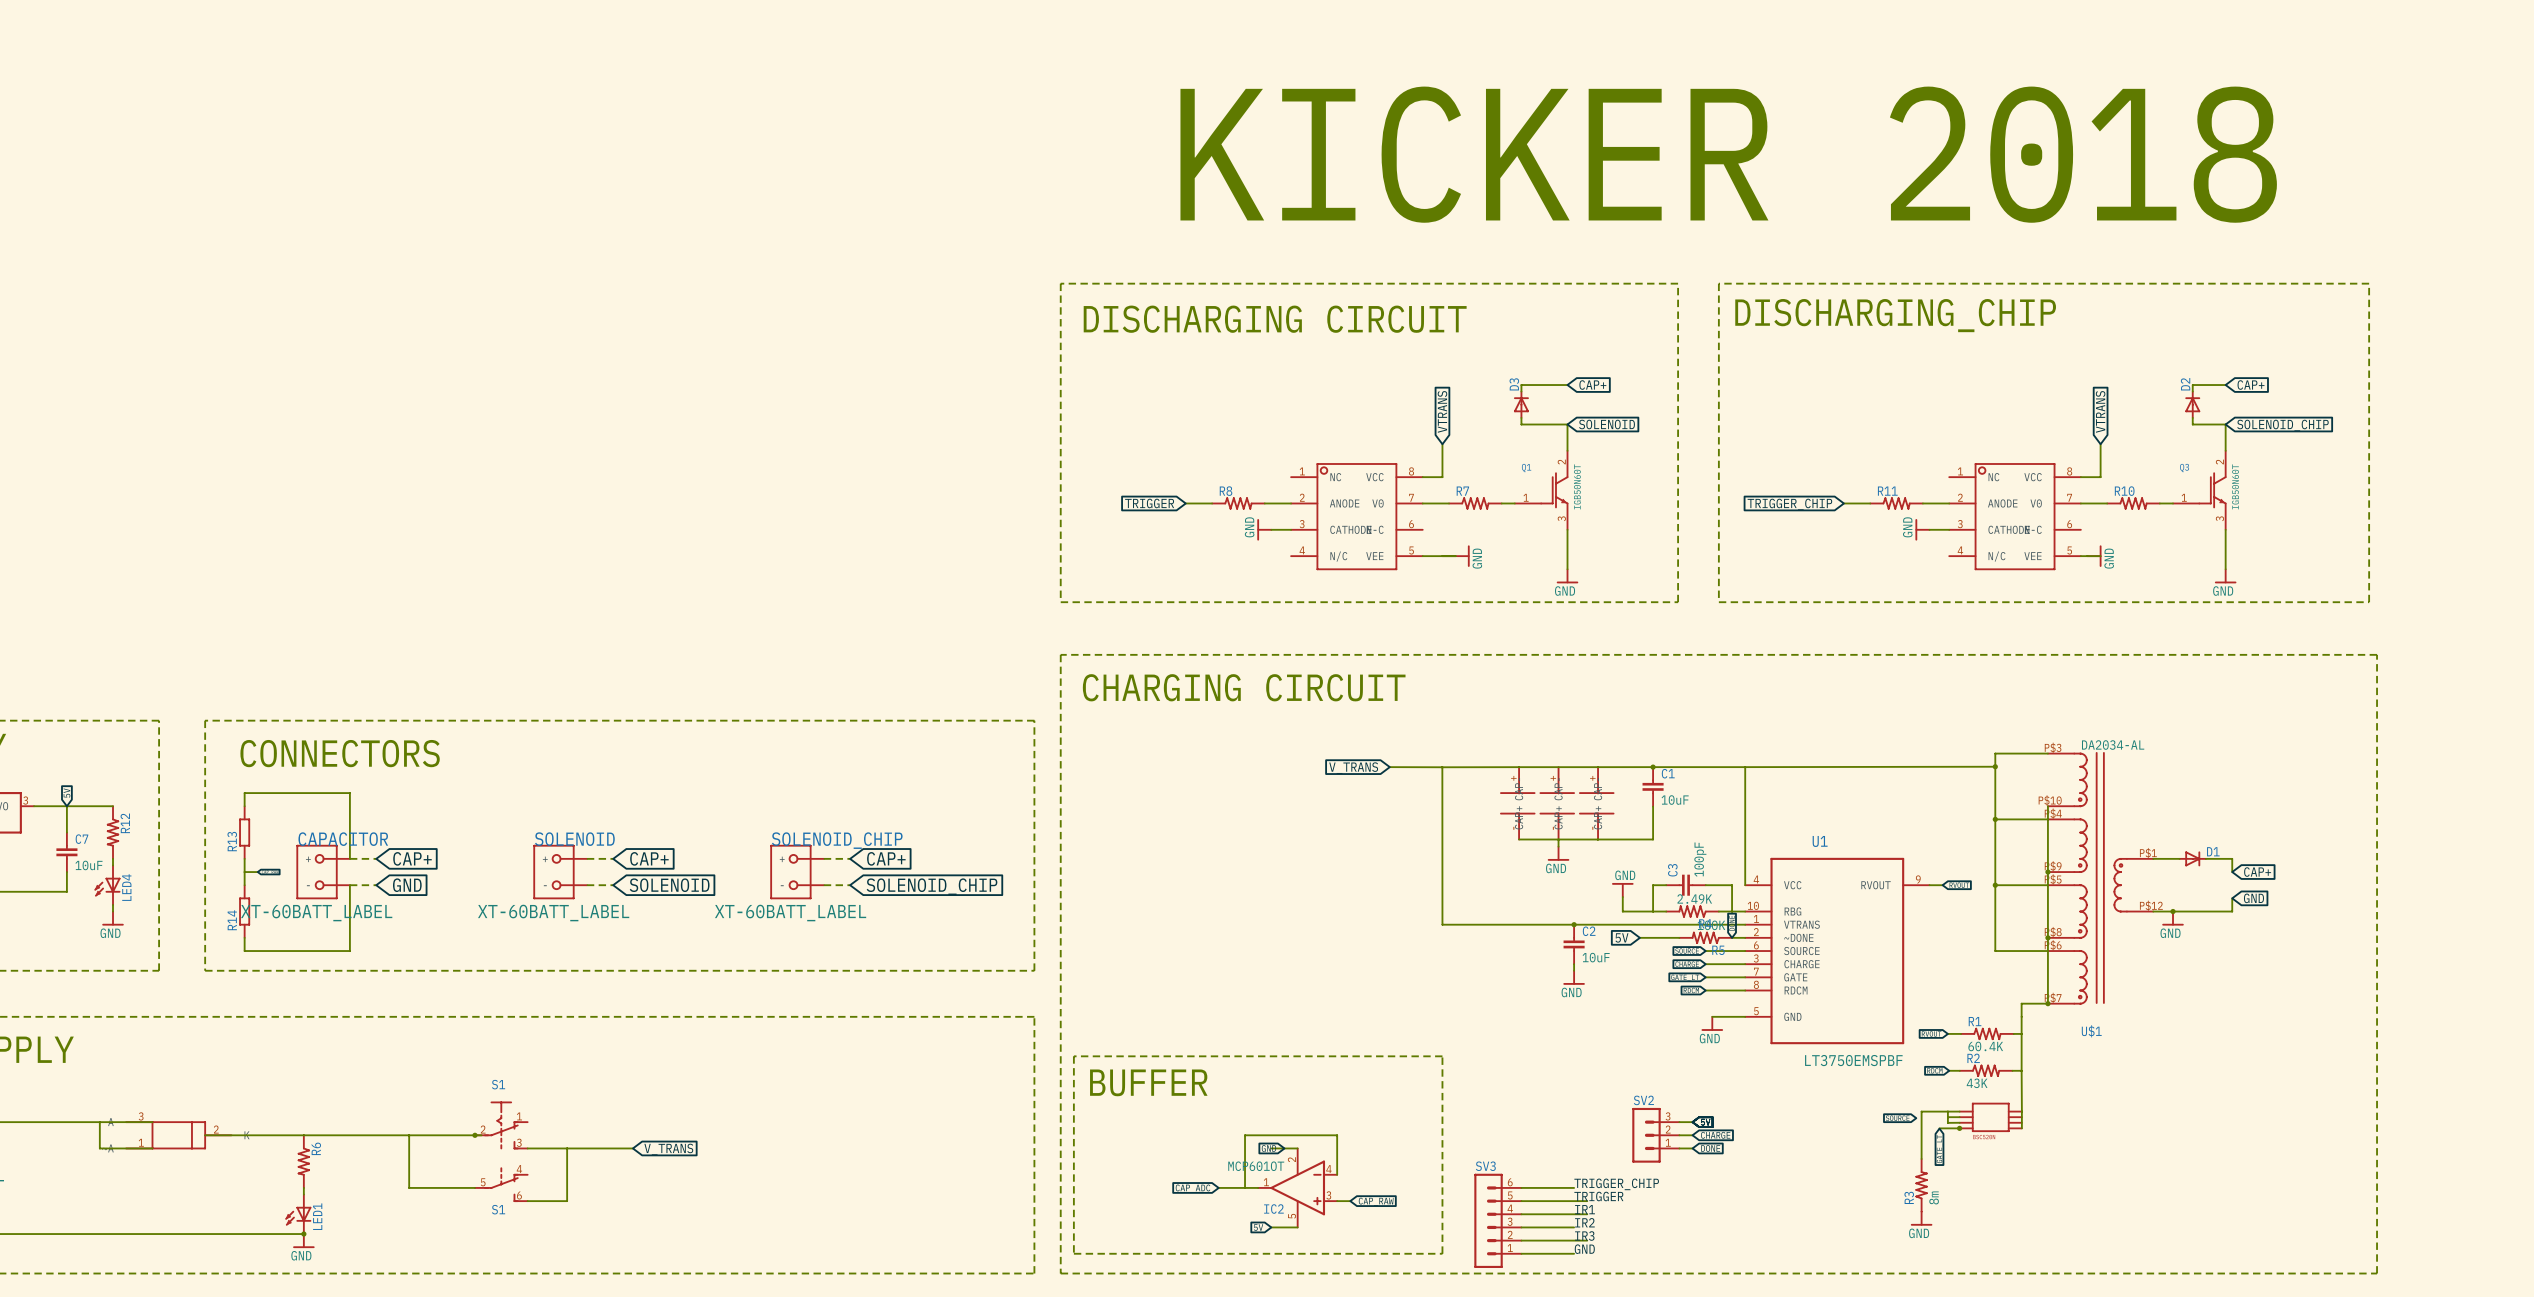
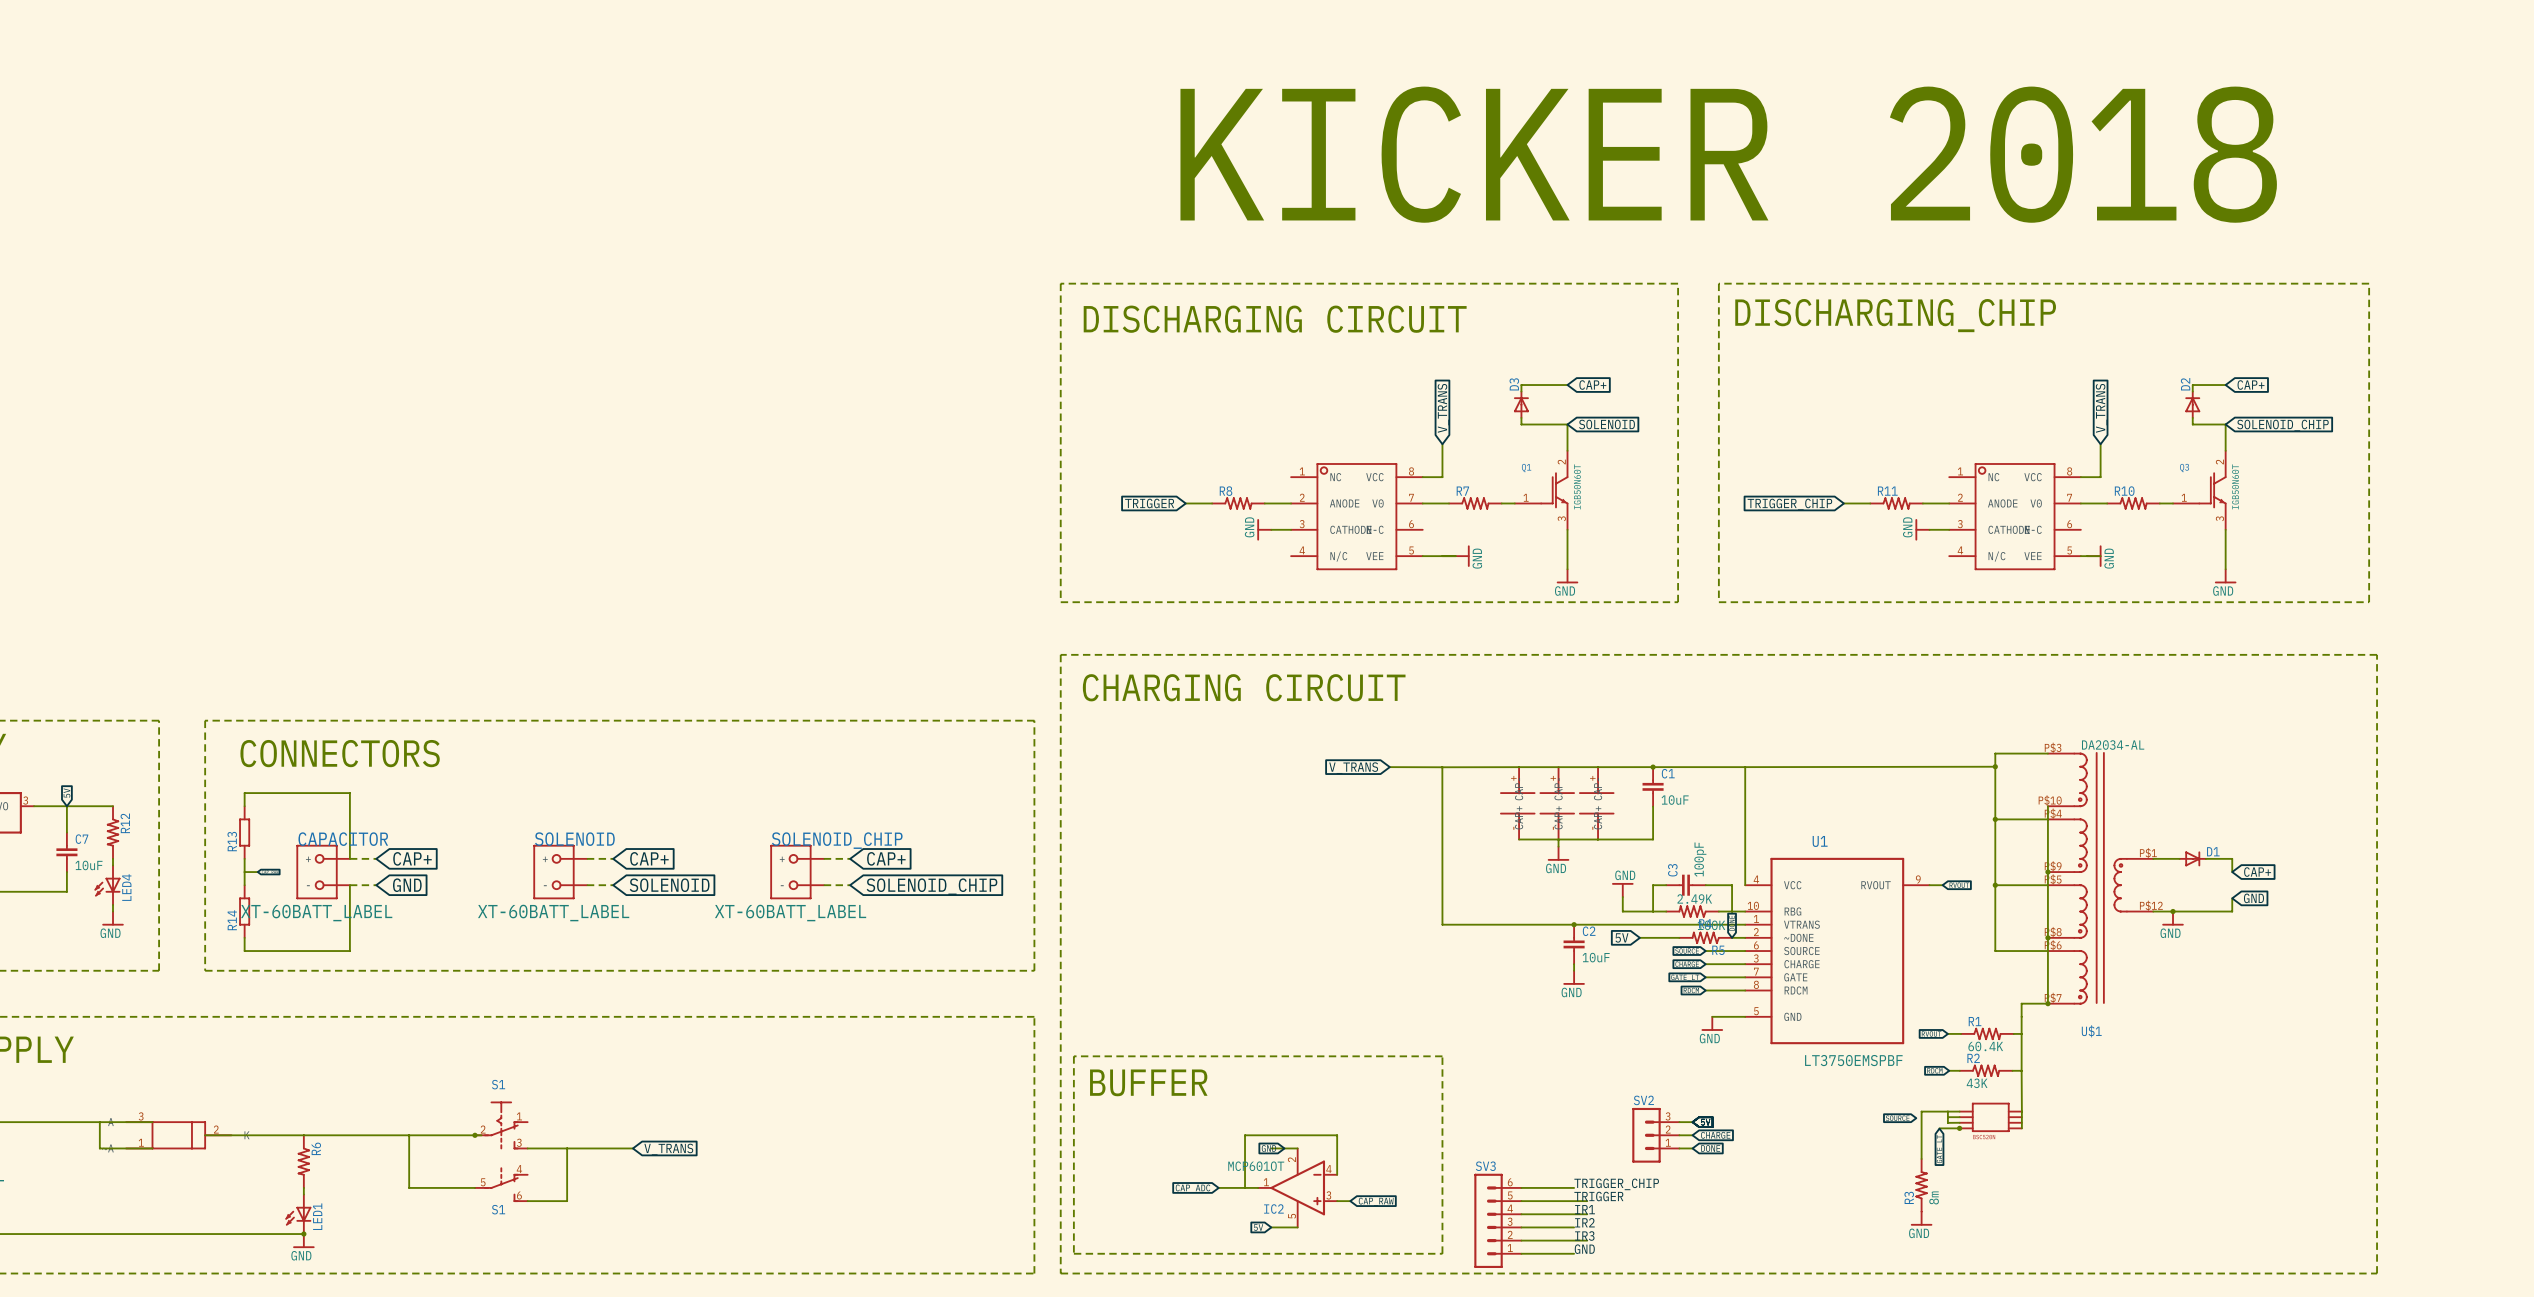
global label: VTRANS (1442, 411) -> V_TRANS (1443, 408)
global label: VTRANS (2100, 411) -> V_TRANS (2101, 408)

